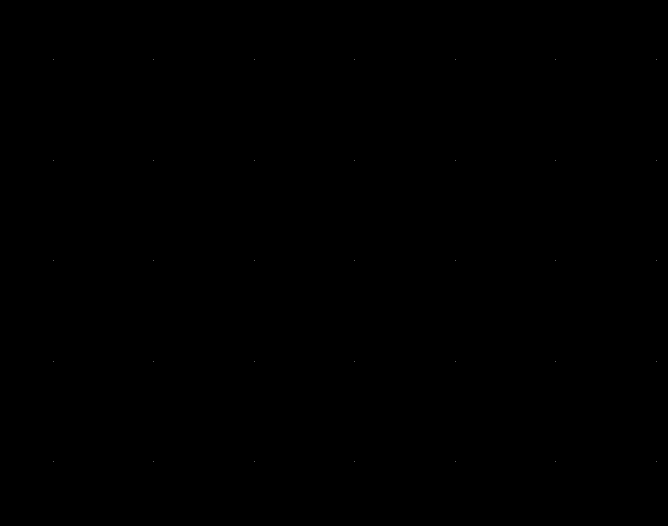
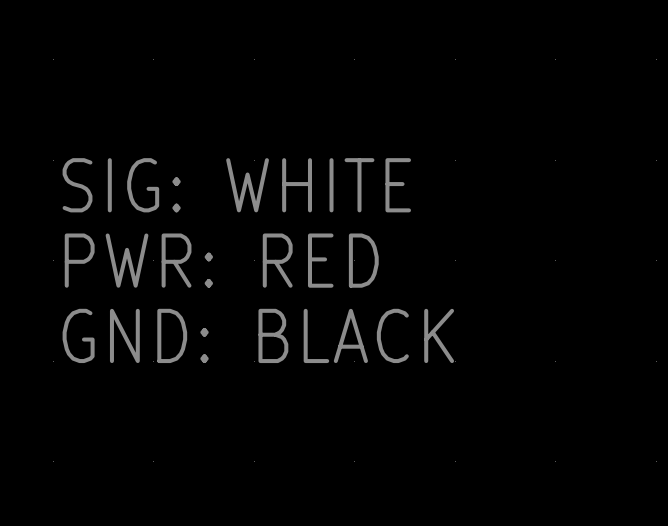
text: none -> SIG: WHITE (236, 185)
text: none -> PWR: RED (221, 260)
text: none -> GND: BLACK (258, 335)

